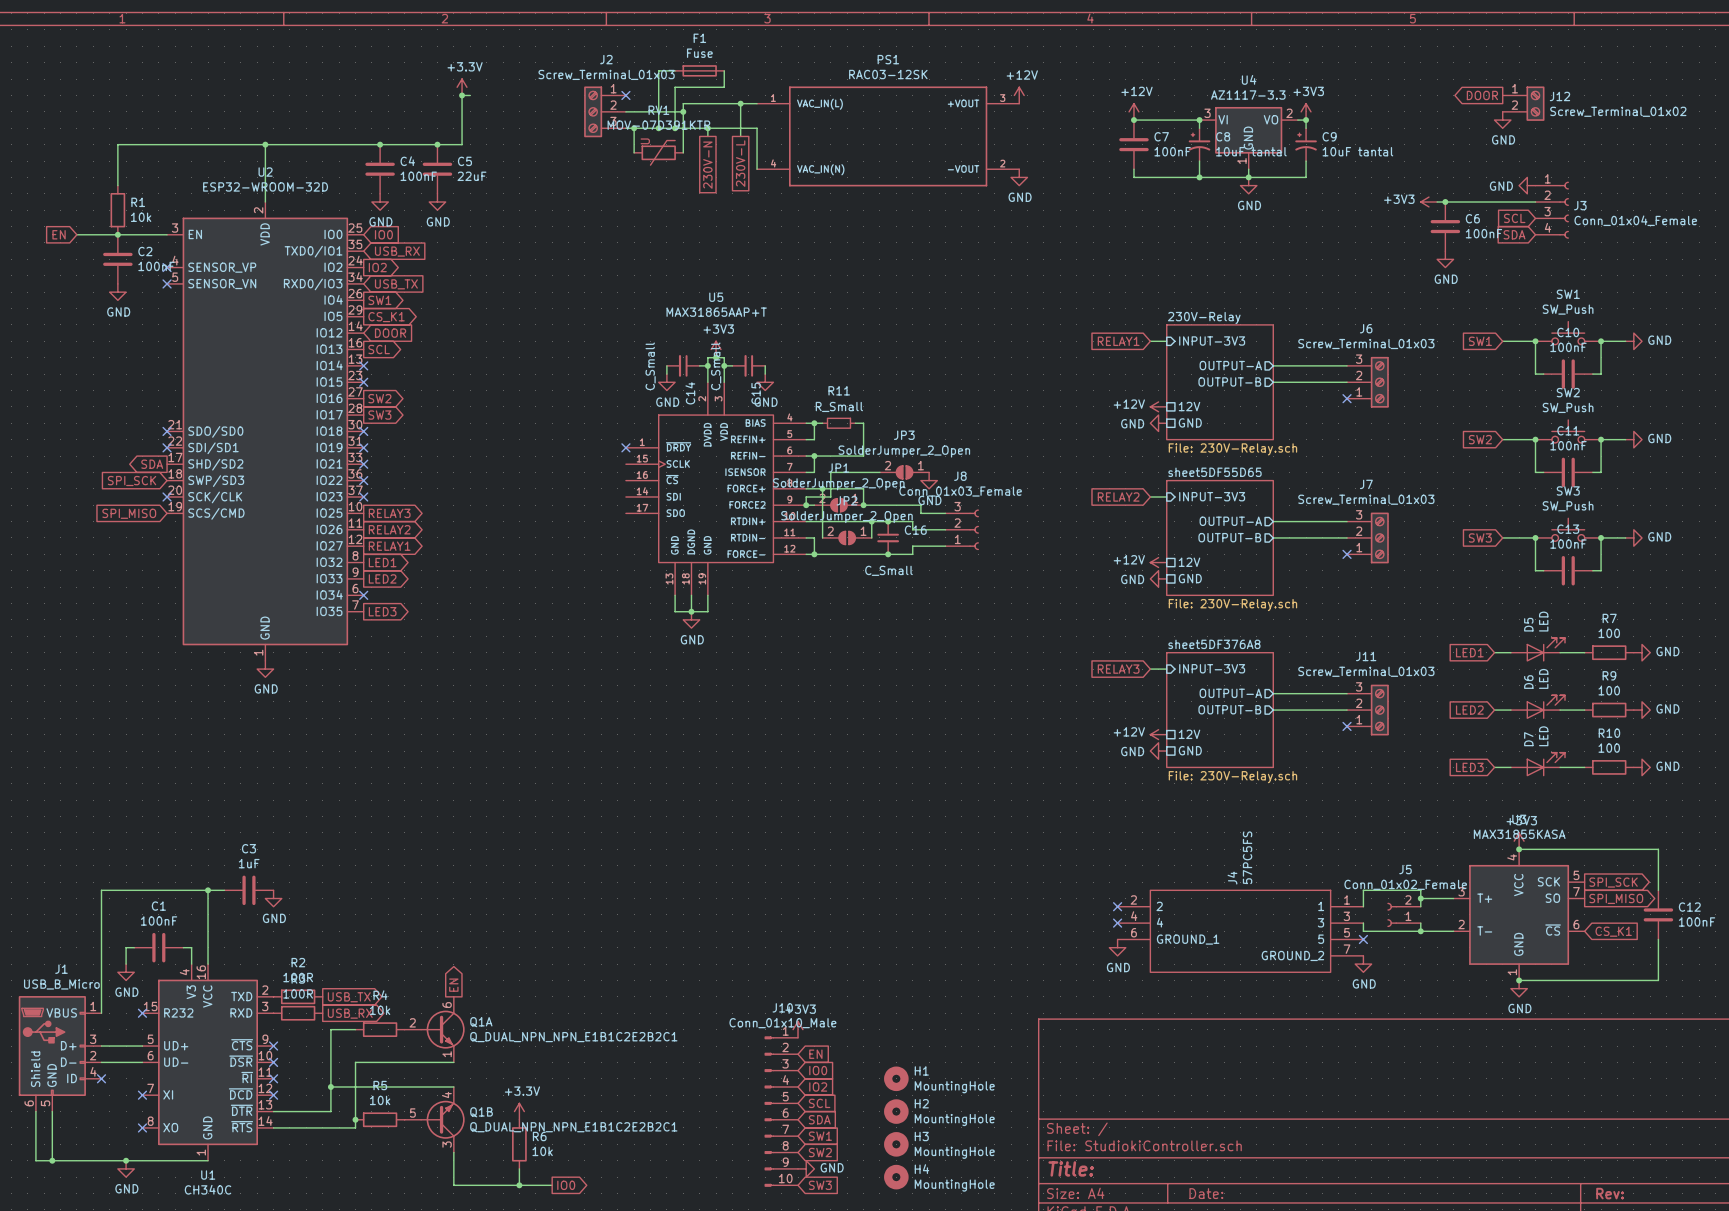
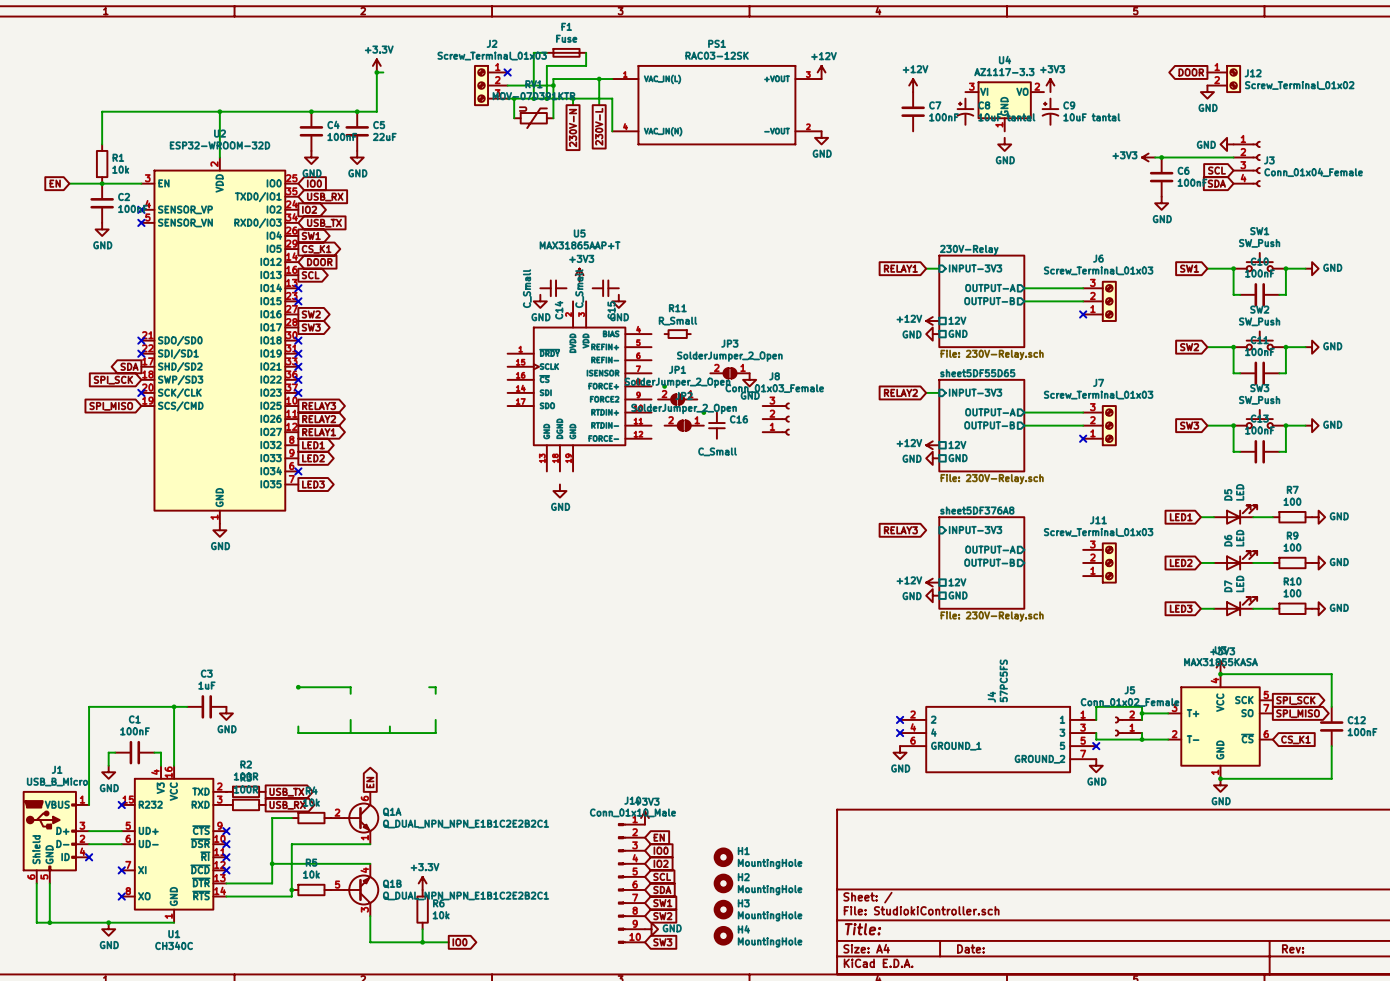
wire: (1133, 120) (1199, 120) (1199, 128) -> none
junction: (1133, 120) -> none
junction: (1199, 120) -> none
wire: (1297, 120) (1306, 120) (1306, 128) -> none
junction: (1306, 120) -> none
wire: (1199, 161) (1199, 177) -> none
wire: (1306, 161) (1306, 177) (1133, 177) (1133, 169) -> none
wire: (1248, 169) (1248, 177) -> none
junction: (1199, 177) -> none
junction: (1248, 177) -> none
junction: (716, 357) -> none
wire: (666, 365) (666, 374) -> none
wire: (699, 365) (707, 365) -> none
junction: (707, 365) -> none
wire: (724, 365) (732, 365) -> none
junction: (724, 365) -> none
wire: (765, 365) (765, 374) -> none
wire: (707, 382) (707, 357) (724, 357) (724, 382) -> none
wire: (806, 423) (822, 423) -> none
wire: (814, 423) (814, 439) (806, 439) -> none
junction: (814, 423) -> none
wire: (855, 423) (863, 423) (863, 456) (806, 456) -> none
no-connect mark: (625, 447) -> none
wire: (814, 456) (814, 472) (806, 472) -> none
junction: (814, 456) -> none
wire: (879, 472) (830, 472) (830, 497) (806, 497) (806, 505) (814, 505) -> none
wire: (806, 488) (863, 488) (863, 505) (920, 505) (920, 513) (945, 513) -> none
wire: (822, 488) (822, 537) -> none
junction: (806, 505) -> none
junction: (863, 505) -> none
wire: (806, 521) (912, 521) (912, 529) (945, 529) -> none
wire: (871, 521) (871, 537) -> none
junction: (888, 521) -> none
wire: (806, 537) (814, 537) (814, 554) -> none
wire: (945, 546) (912, 546) (912, 554) (806, 554) -> none
junction: (814, 554) -> none
junction: (888, 554) -> none
wire: (675, 595) (675, 611) (707, 611) (707, 595) -> none
wire: (691, 595) (691, 611) -> none
junction: (691, 611) -> none
wire: (1150, 669) (1166, 669) -> none
wire: (1273, 693) (1347, 693) -> none
wire: (1273, 710) (1347, 710) -> none
no-connect mark: (1347, 726) -> none
wire: none -> (298, 687) (350, 687) (350, 693)
junction: none -> (298, 687)
wire: none -> (429, 687) (435, 687) (435, 693)
wire: none -> (350, 719) (350, 733)
wire: none -> (435, 719) (435, 733) (298, 733) (298, 726)
wire: none -> (389, 726) (389, 733)

